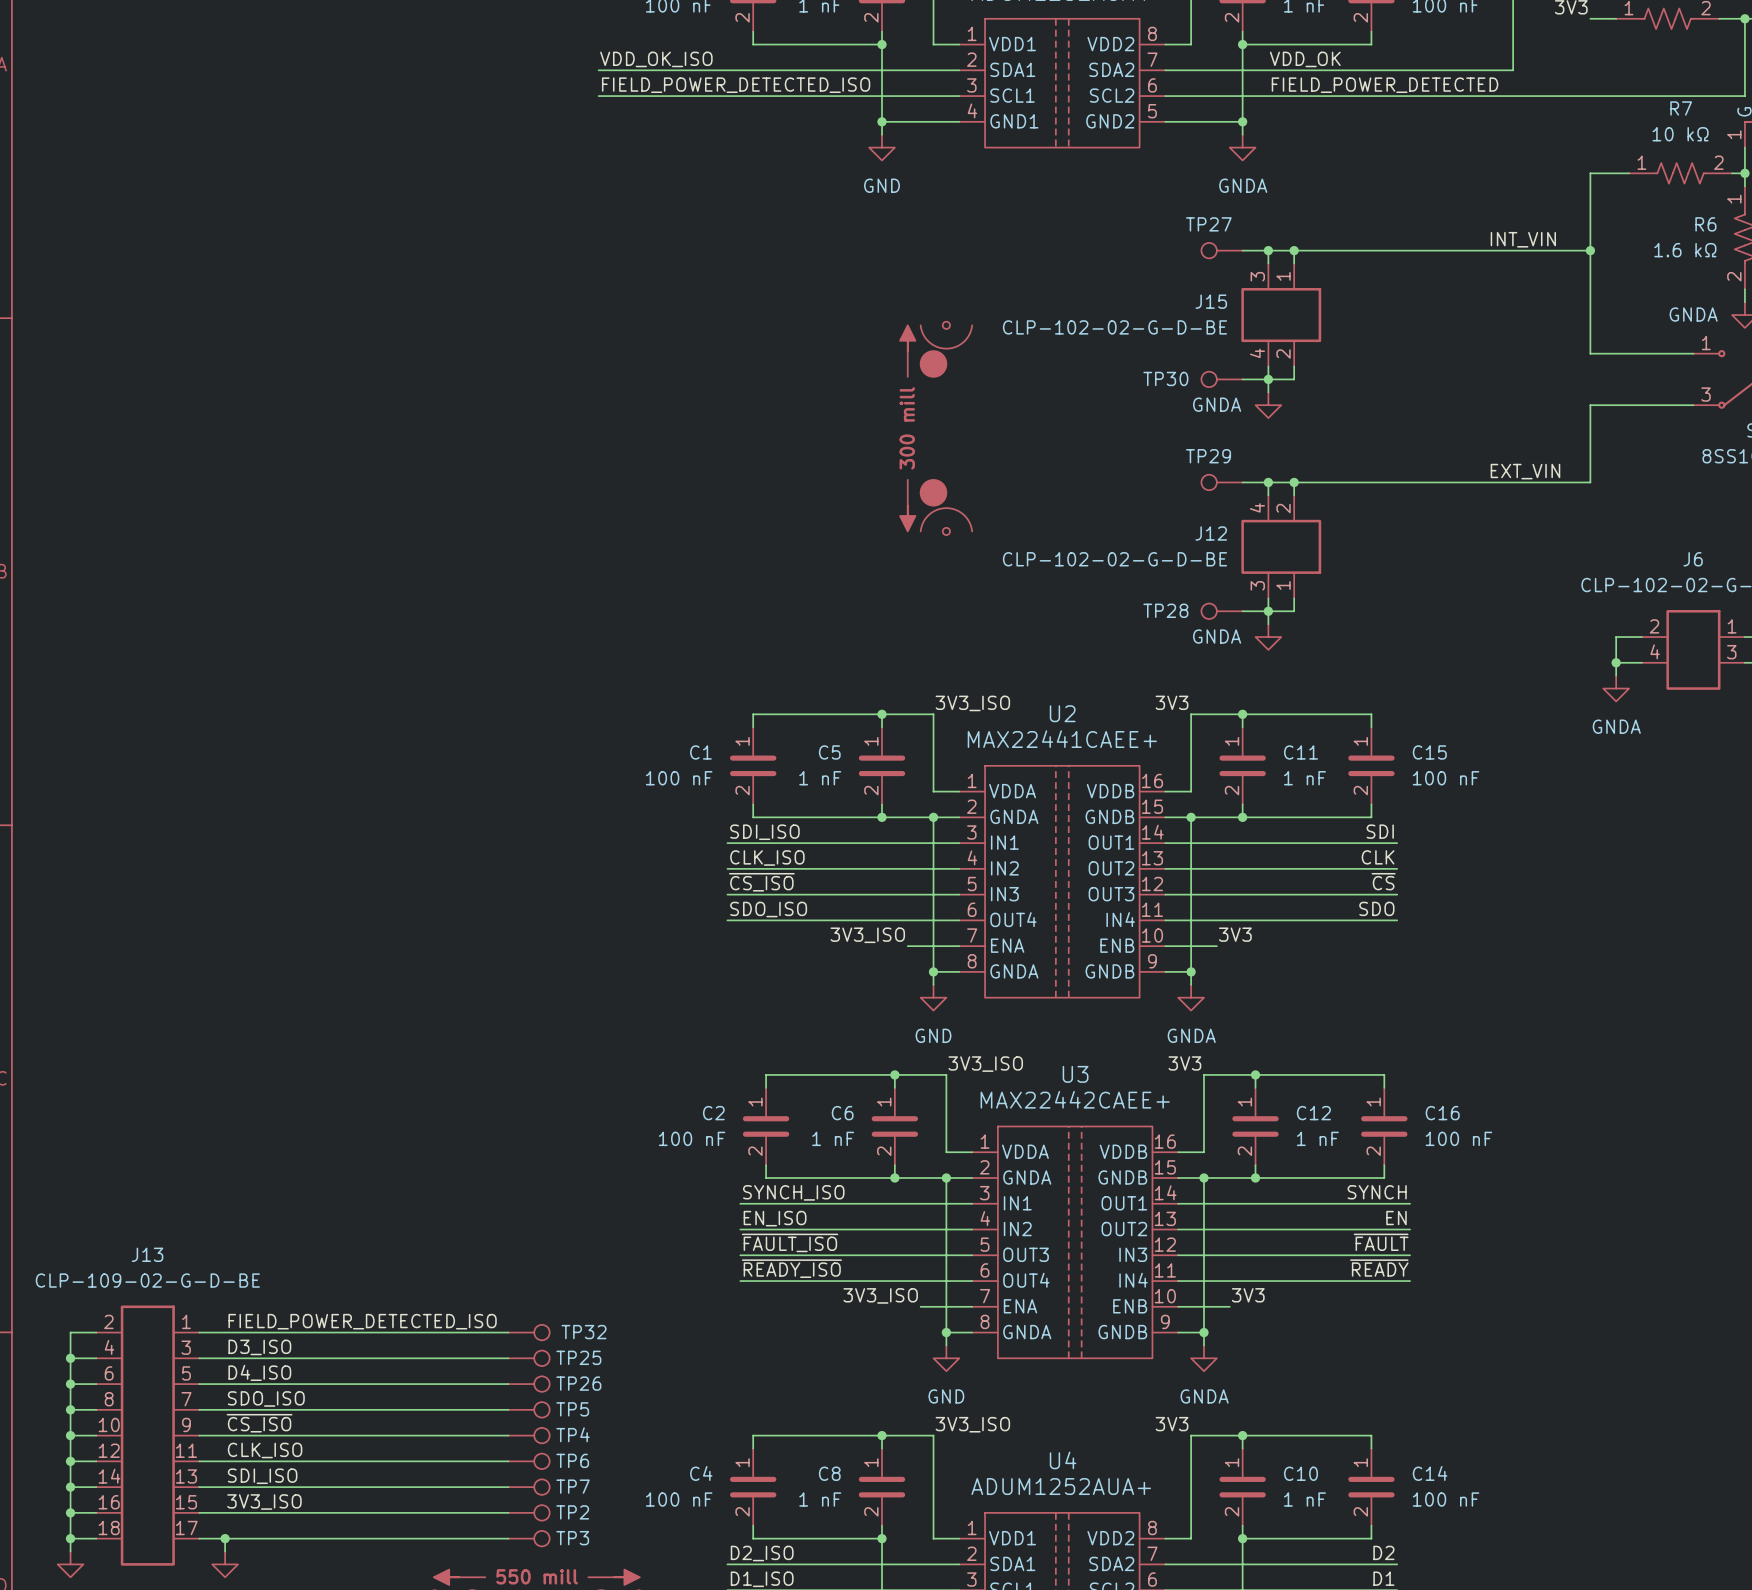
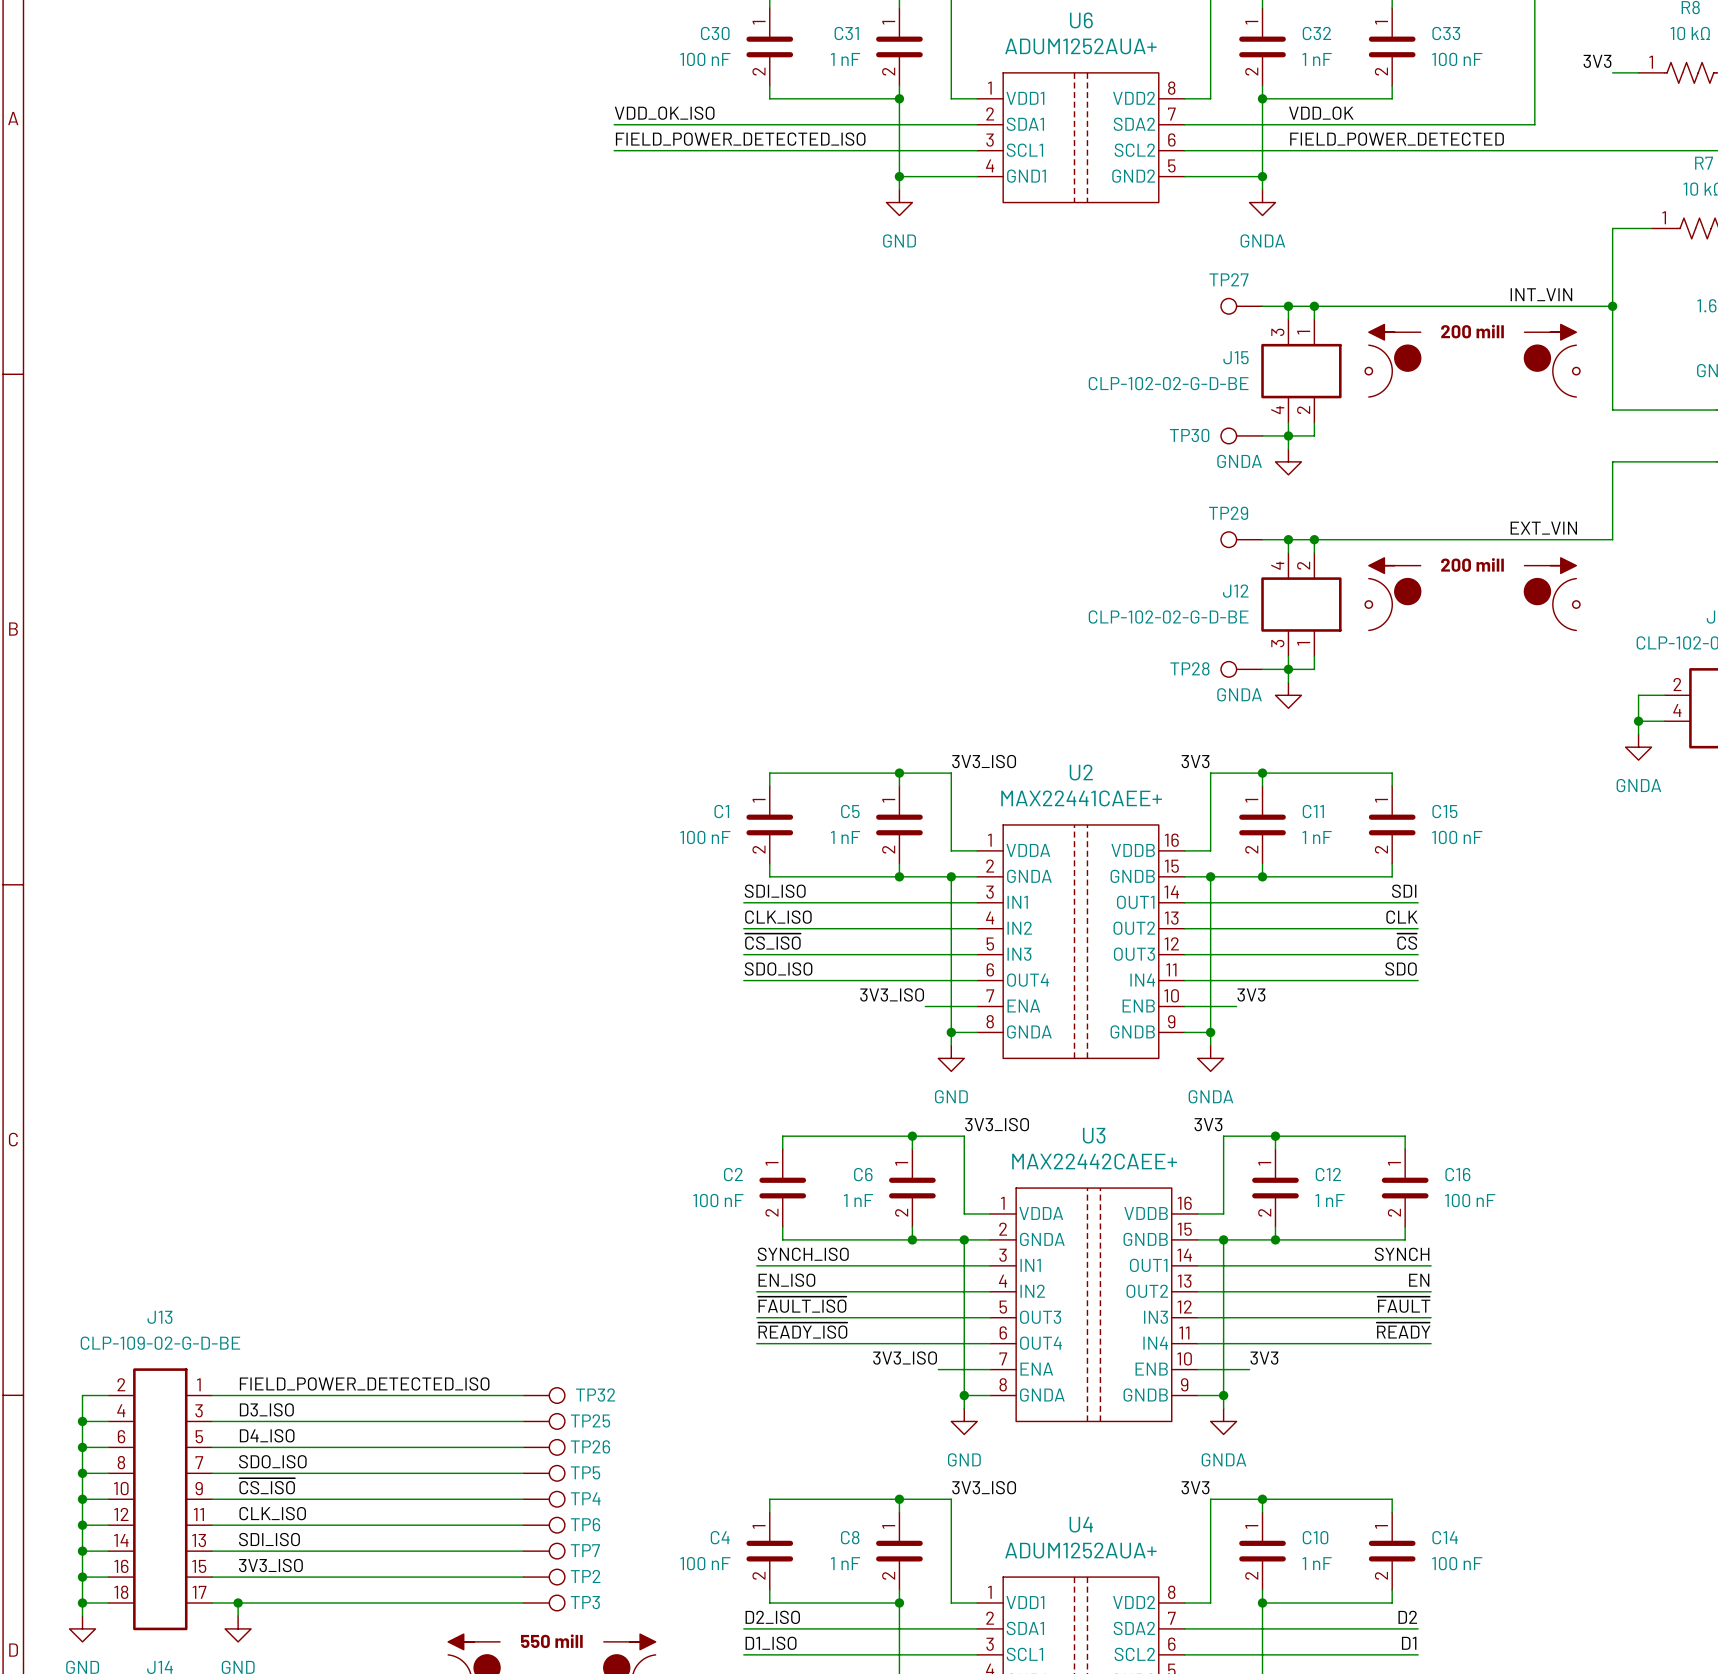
part: none -> (1472, 360)
part: (936, 428) -> none
part: none -> (1472, 594)

